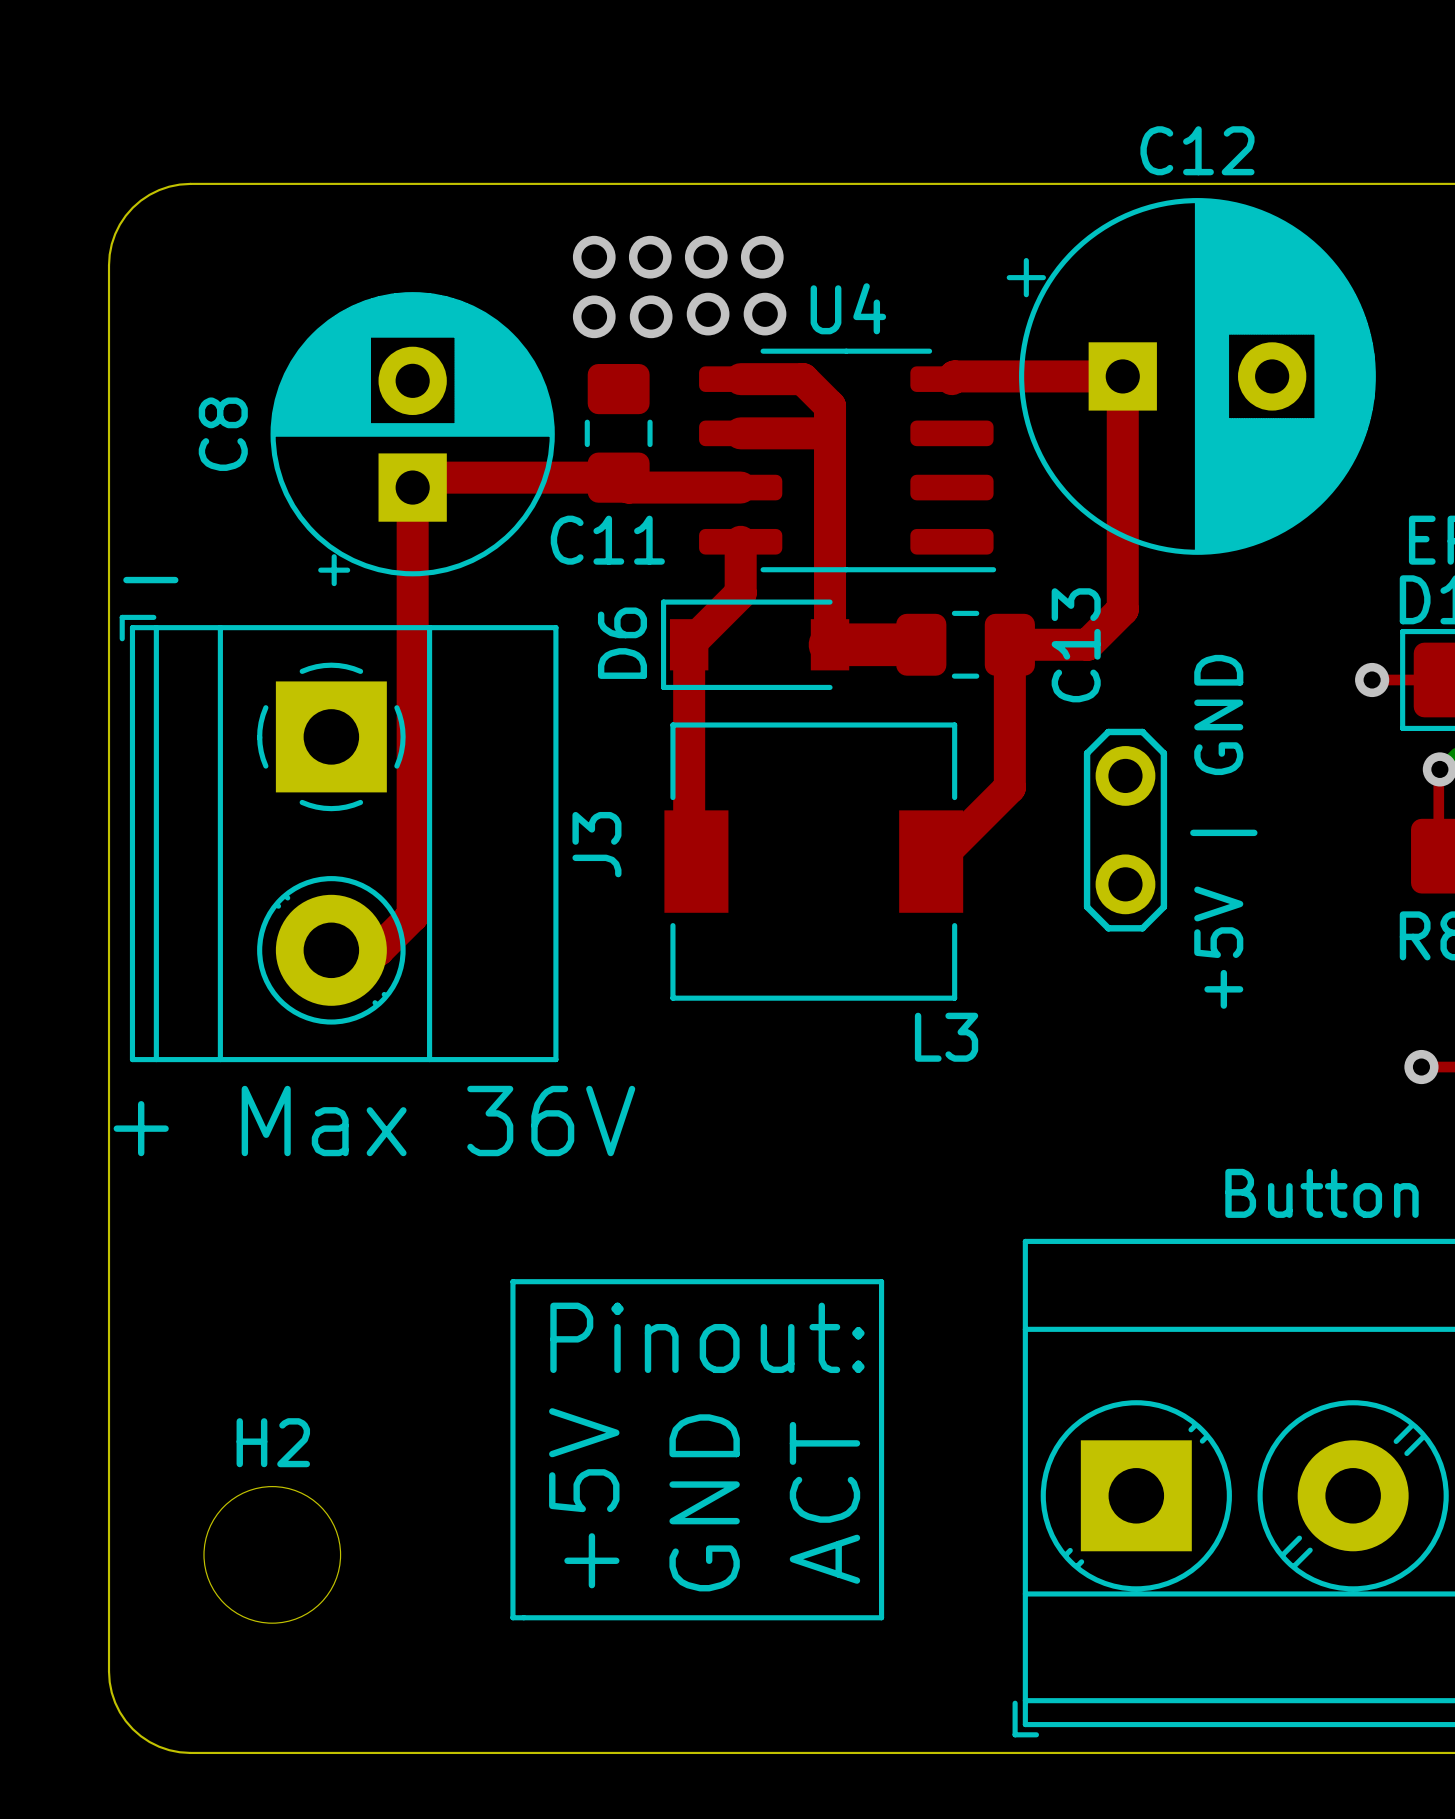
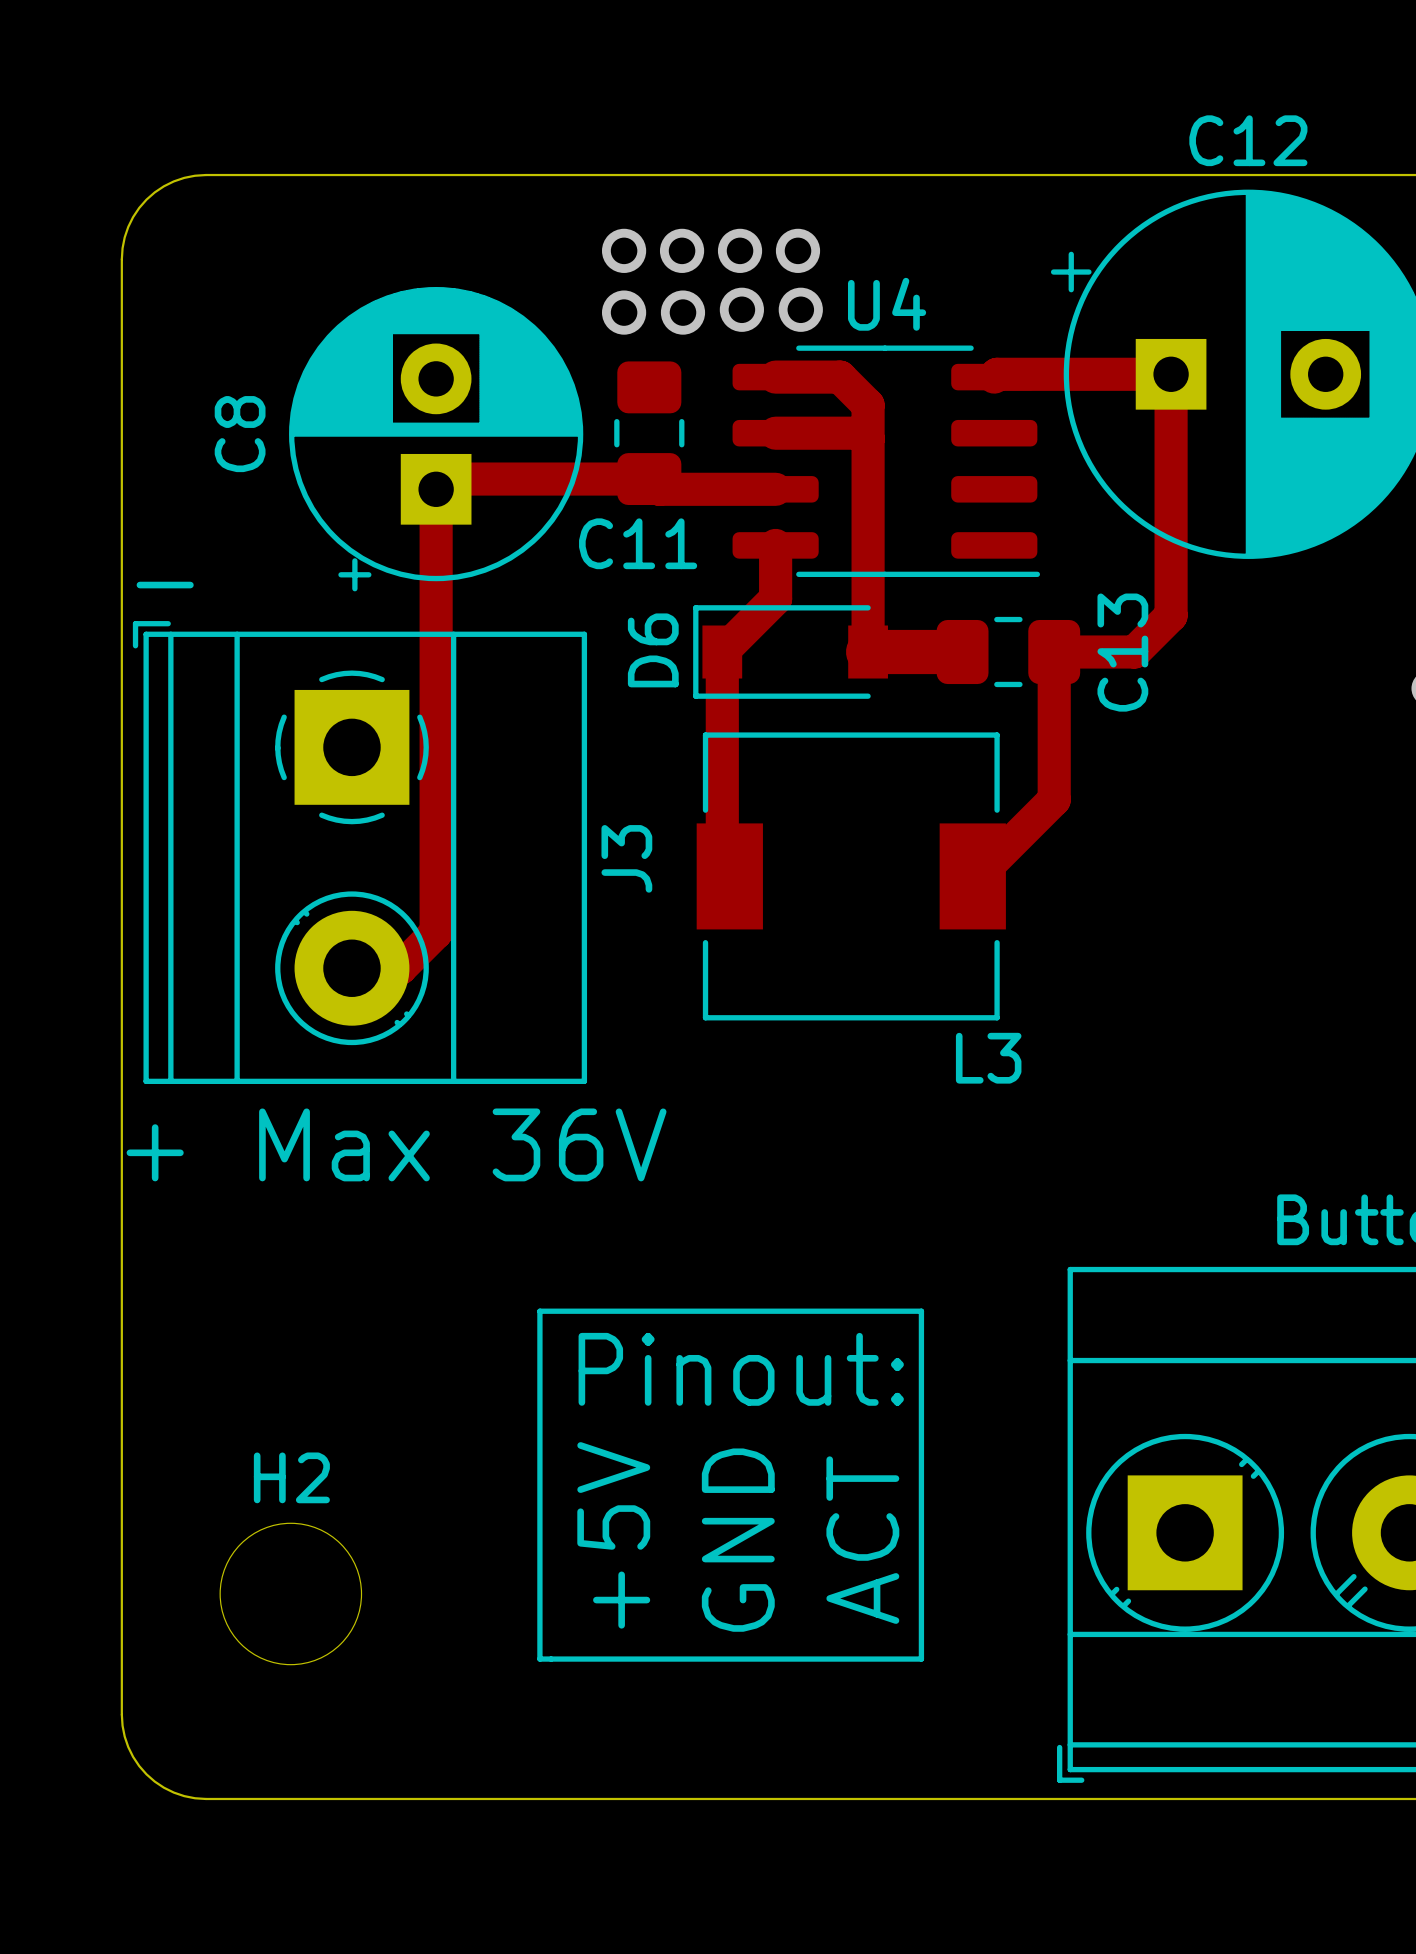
part: (1125, 830) -> none
text: +5V | GND (1223, 831) -> none

